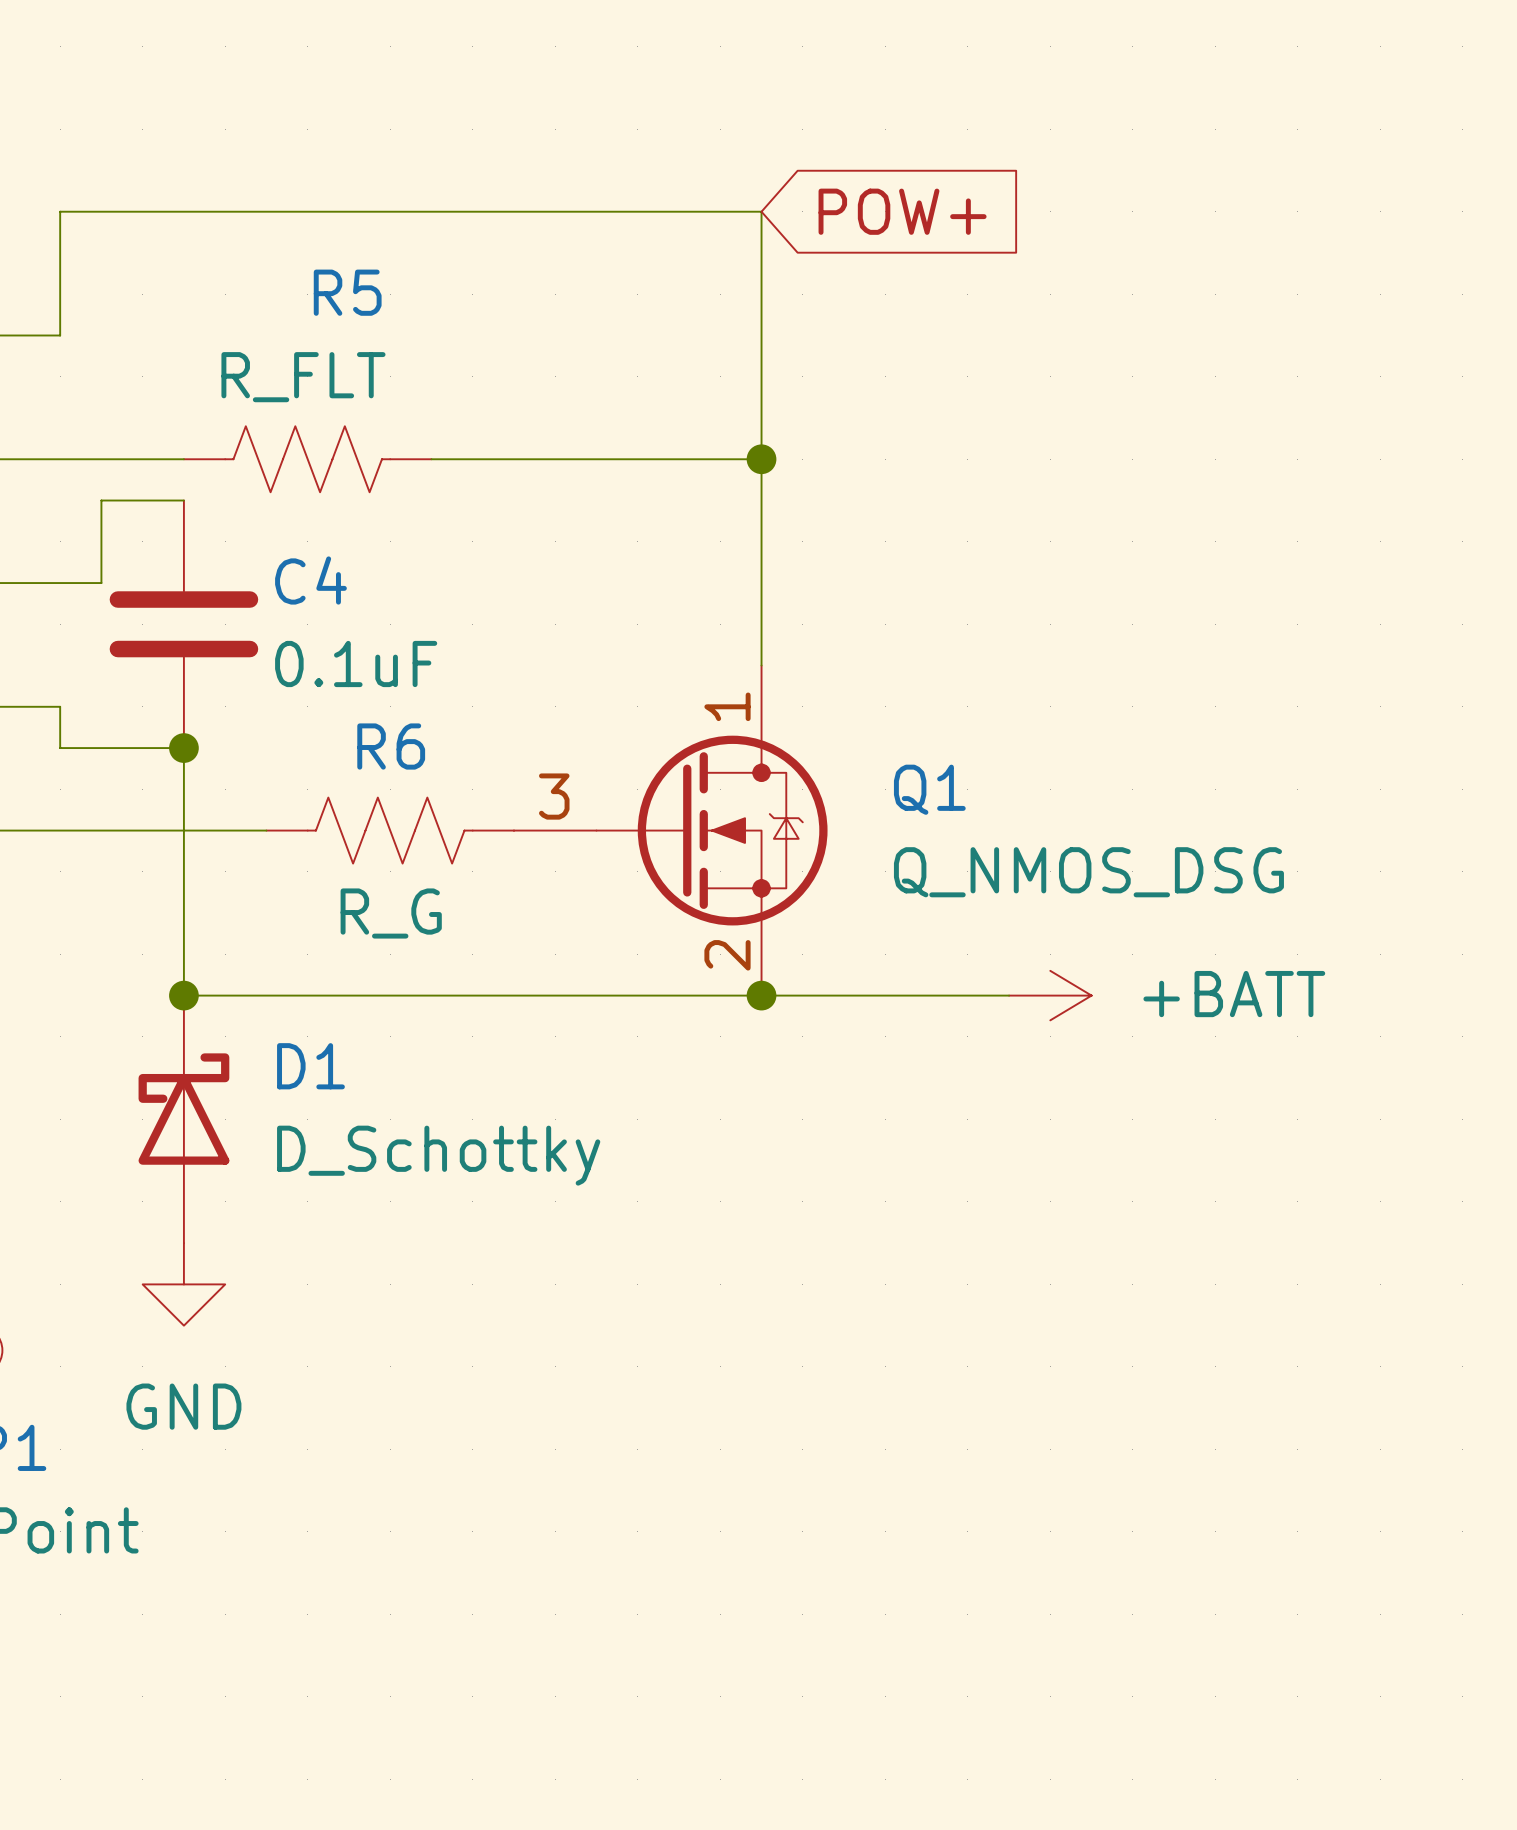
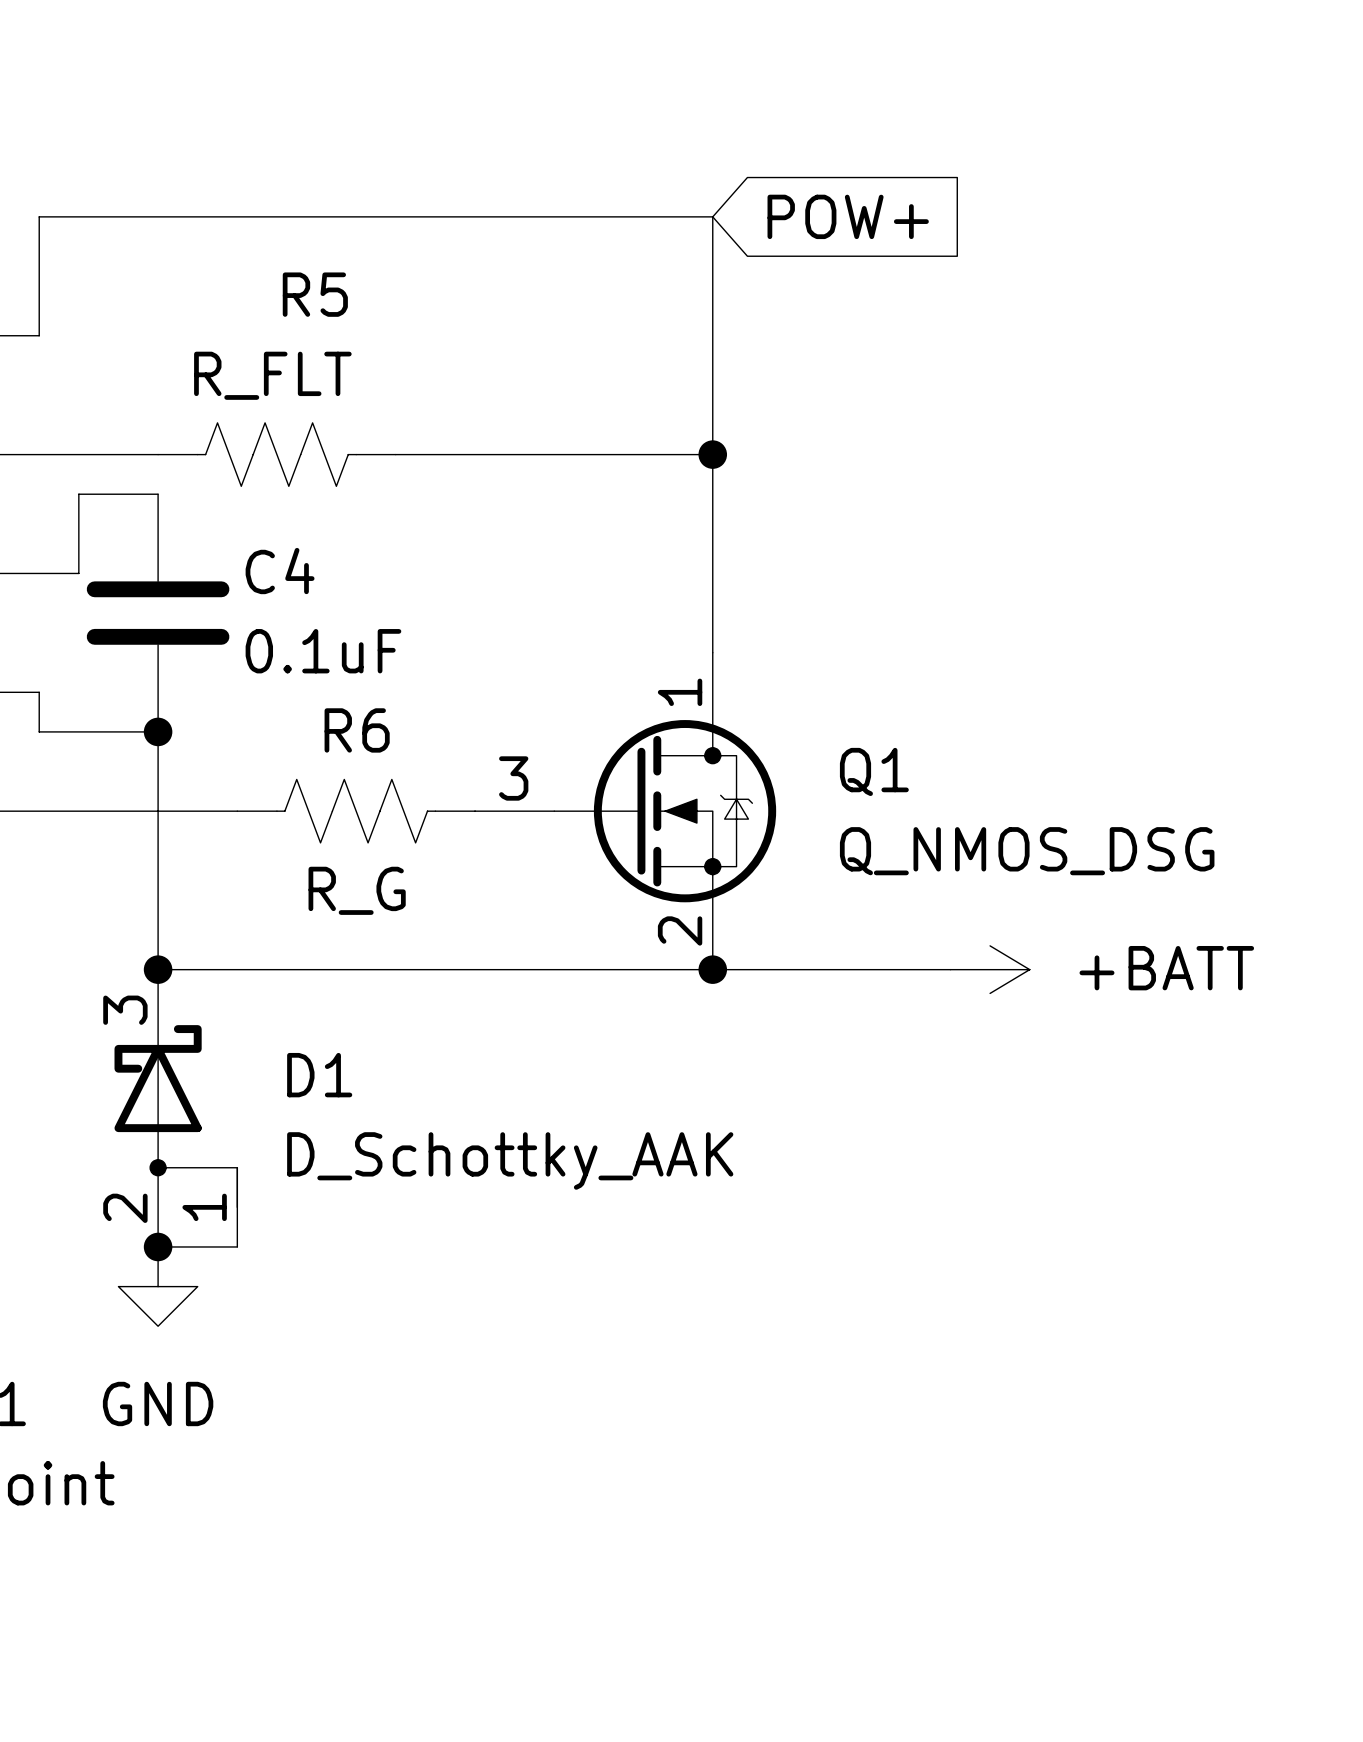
D1 symbol: [138, 995, 230, 1244] -> [114, 969, 238, 1247]
D1 value: D_Schottky (438, 1155) -> D_Schottky_AAK (510, 1160)
wire: none -> (158, 1246) (237, 1246)
power symbol position: GND (183, 1284) -> GND (158, 1286)
junction: none -> (158, 1246)

